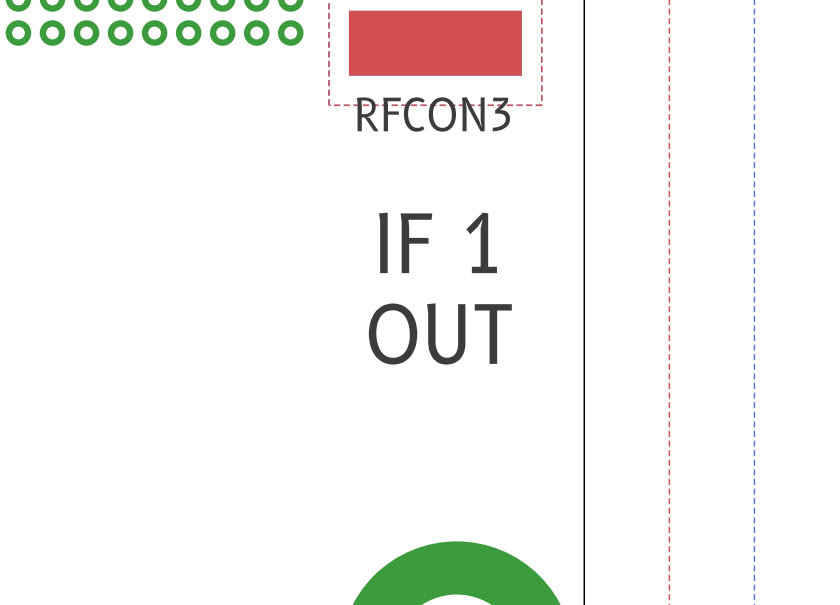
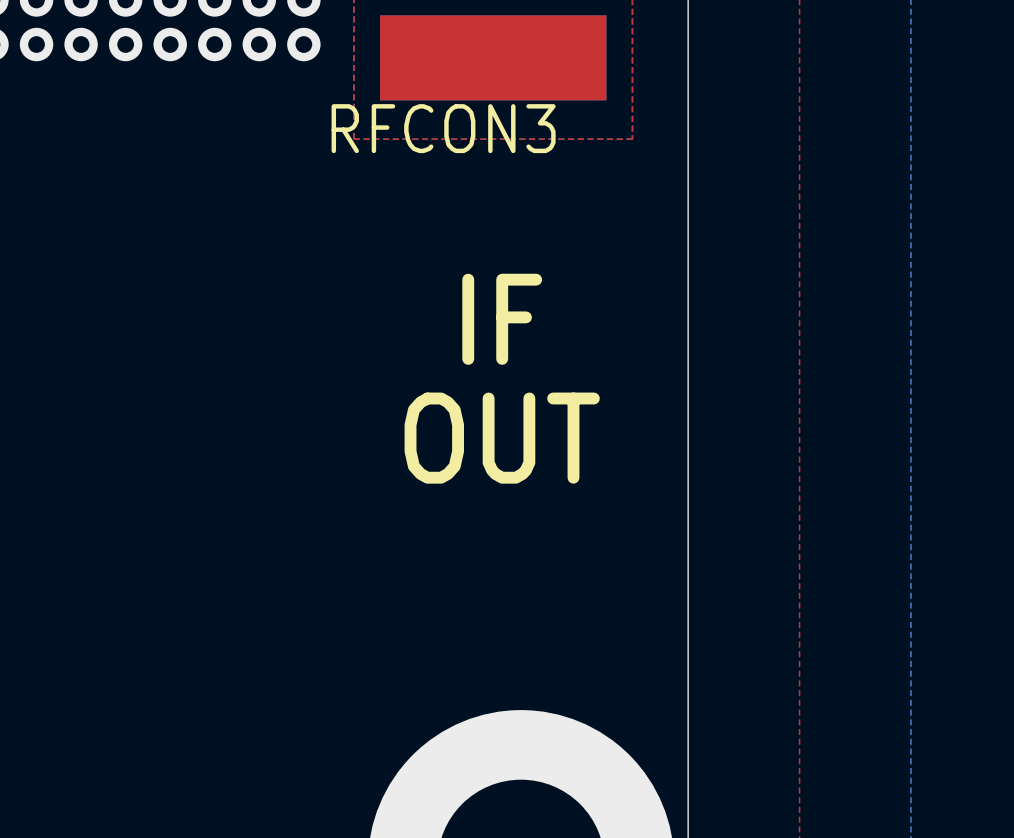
RFCON3 name position: RFCON3 (433, 114) -> RFCON3 (443, 128)
text: IF 1 (438, 242) -> IF (502, 319)

